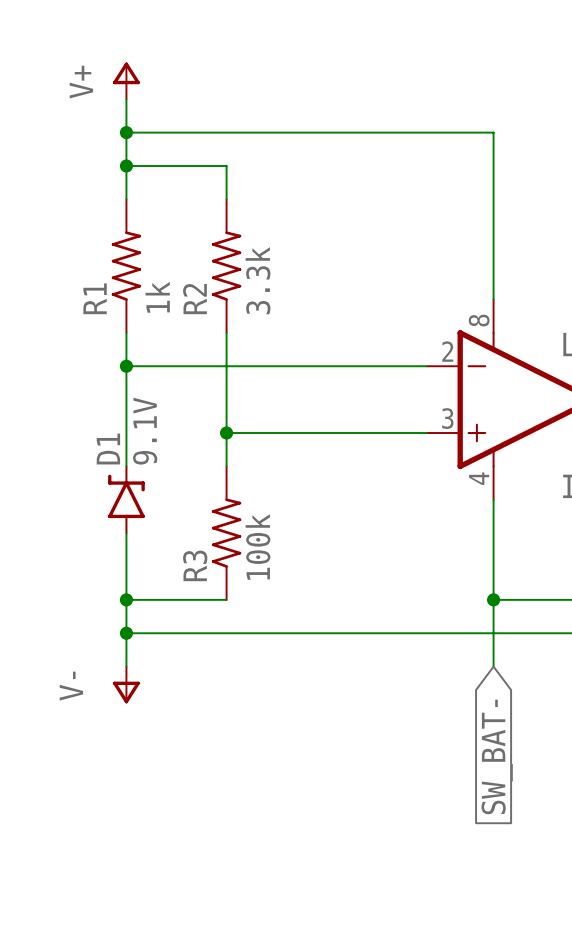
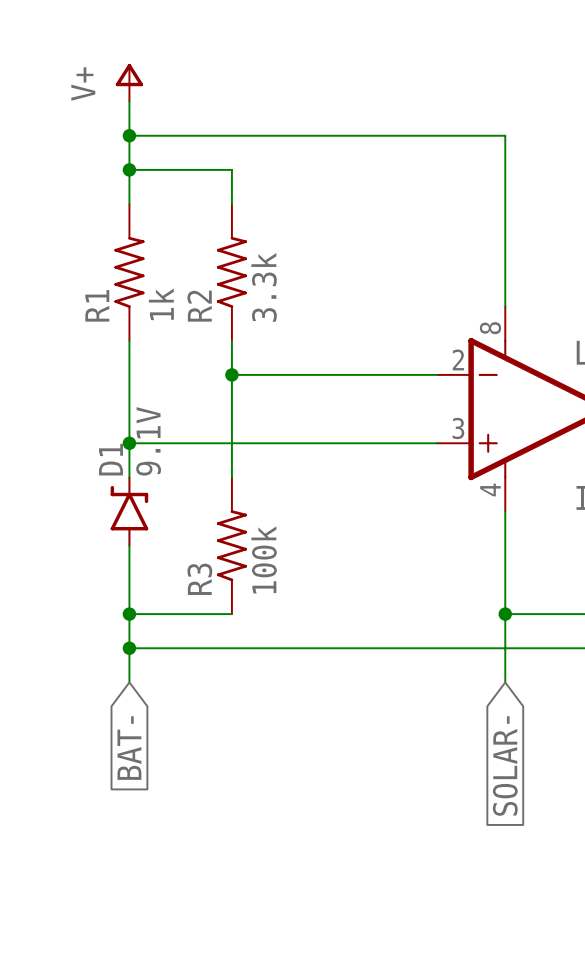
wire: (126, 366) (226, 366) -> (129, 443) (231, 443)
junction: (126, 366) -> none
junction: none -> (231, 374)
junction: none -> (129, 443)
junction: (226, 433) -> none
power symbol: V- (126, 684) -> none
global label: none -> BAT- (129, 748)
global label: SW_BAT- (497, 756) -> SOLAR- (505, 766)

